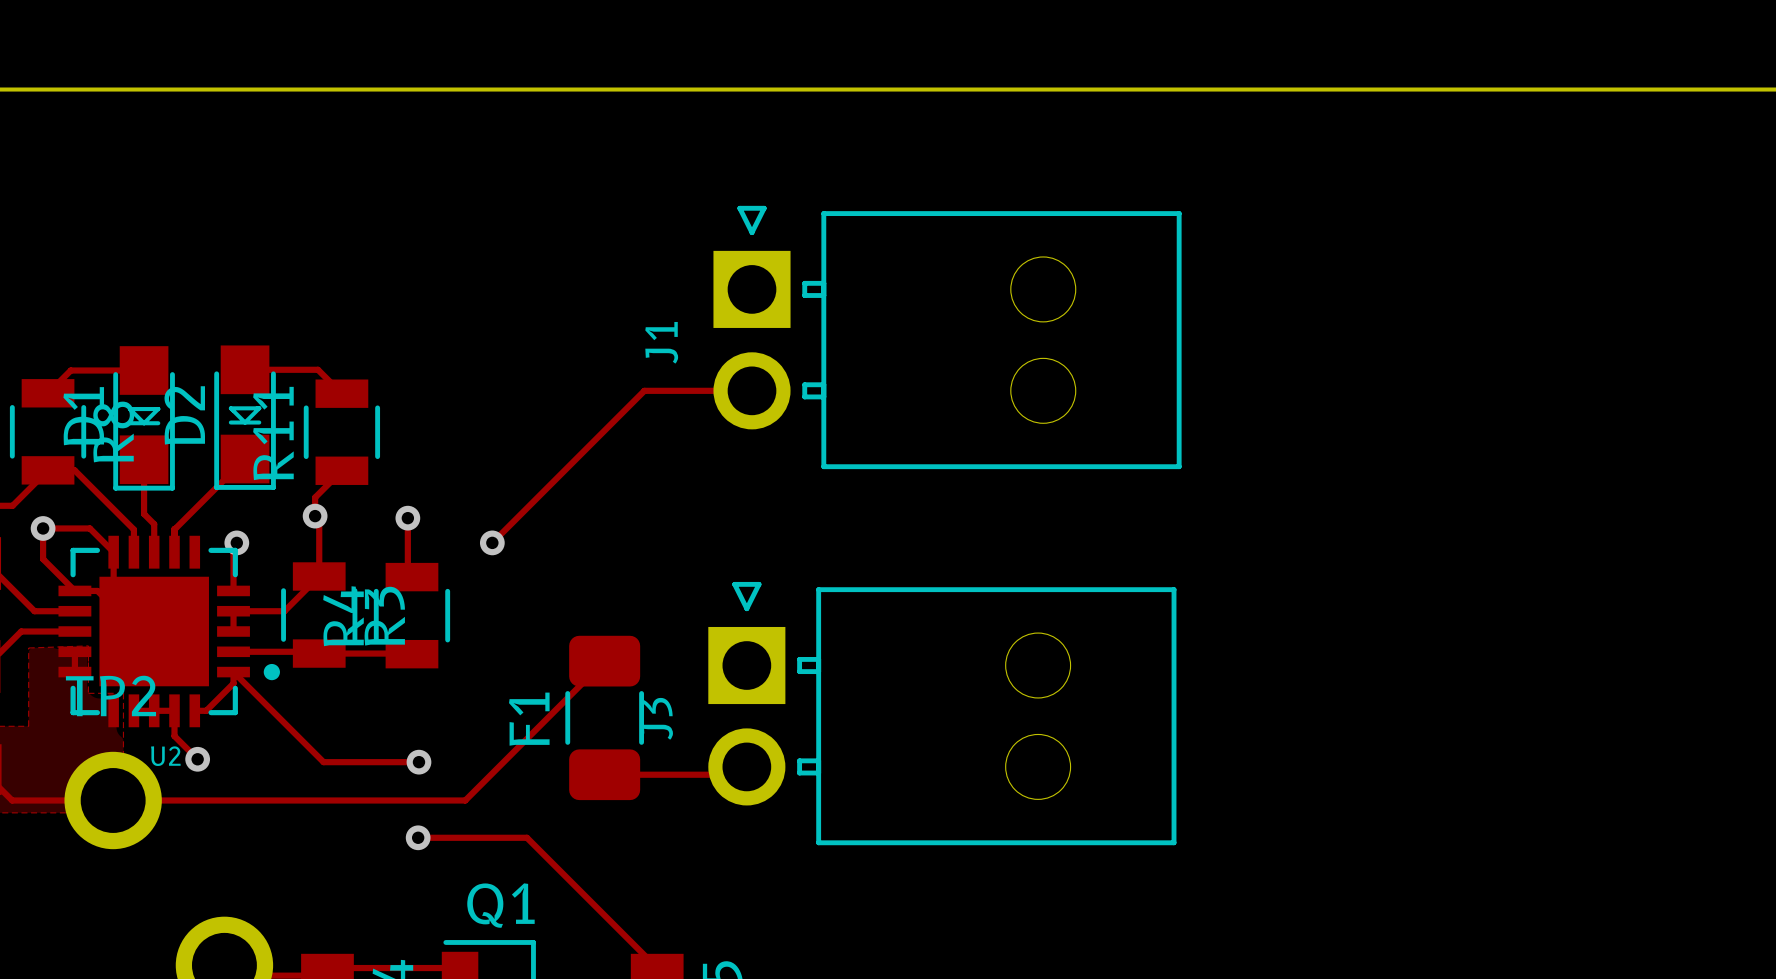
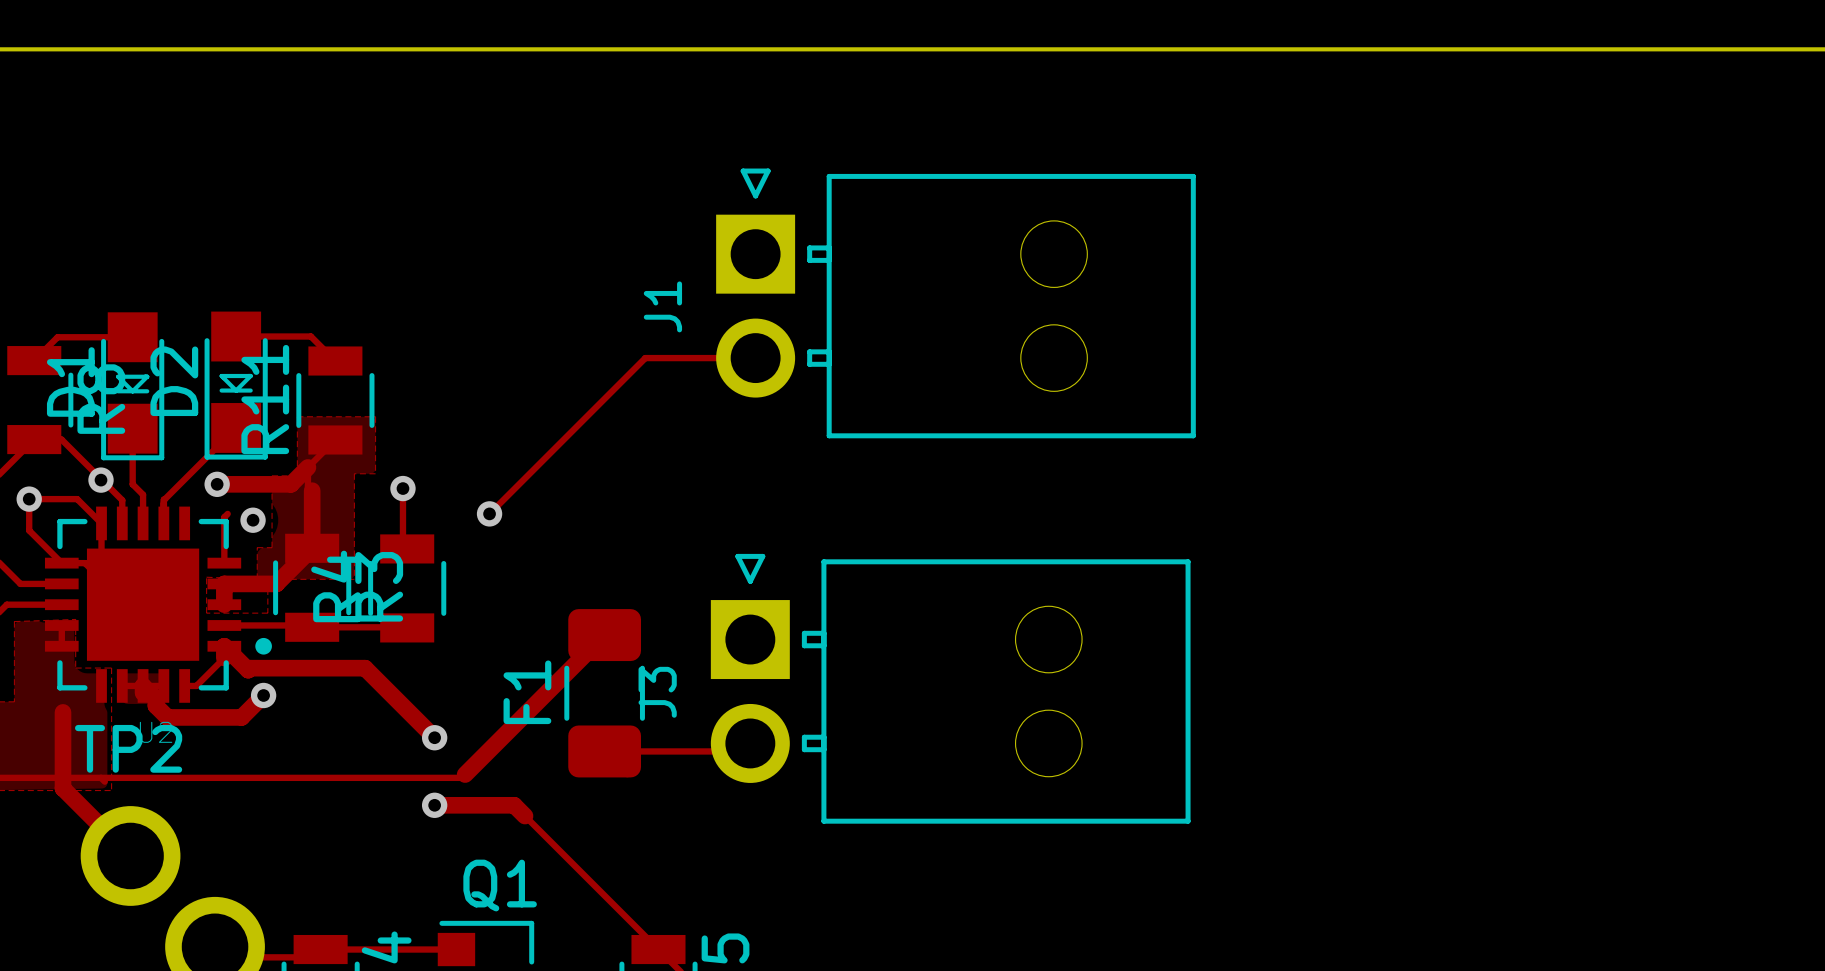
zone outline: none -> (297, 416) (297, 475) (272, 475) (272, 547) (257, 547) (257, 579) (206, 577) (206, 613) (267, 613) (267, 579) (354, 579) (354, 473) (375, 473) (375, 416) (297, 416)
track: none -> (307, 467) (291, 484) (217, 484)
via: none -> (101, 480)
via: none -> (217, 484)
via: (315, 516) -> none
track width: thin (319, 520) (319, 576) (284, 611) (233, 611) (233, 631) -> thick (312, 490) (312, 548) (276, 583) (224, 583) (224, 604)
via position: (236, 542) -> (253, 520)
track width: thin (604, 661) (468, 797) -> thick (604, 635) (465, 774)
track width: thin (233, 683) (233, 672) (256, 695) -> thick (224, 658) (224, 646) (248, 670)
track: (256, 695) (323, 762) (418, 762) -> (248, 670) (250, 668) (365, 668) (434, 737)
track: (174, 710) (174, 736) (197, 759) -> none
track: none -> (143, 693) (143, 685) (155, 698) (155, 705) (167, 717) (241, 717) (263, 695)
via: none -> (263, 695)
track: none -> (63, 712) (63, 788) (130, 855)
via: (197, 759) -> none
via position: (418, 762) -> (434, 737)
TP2 position: (113, 800) -> (130, 855)
track: (418, 837) (526, 837) -> (434, 805) (514, 805) (525, 816)
via position: (418, 837) -> (434, 805)

